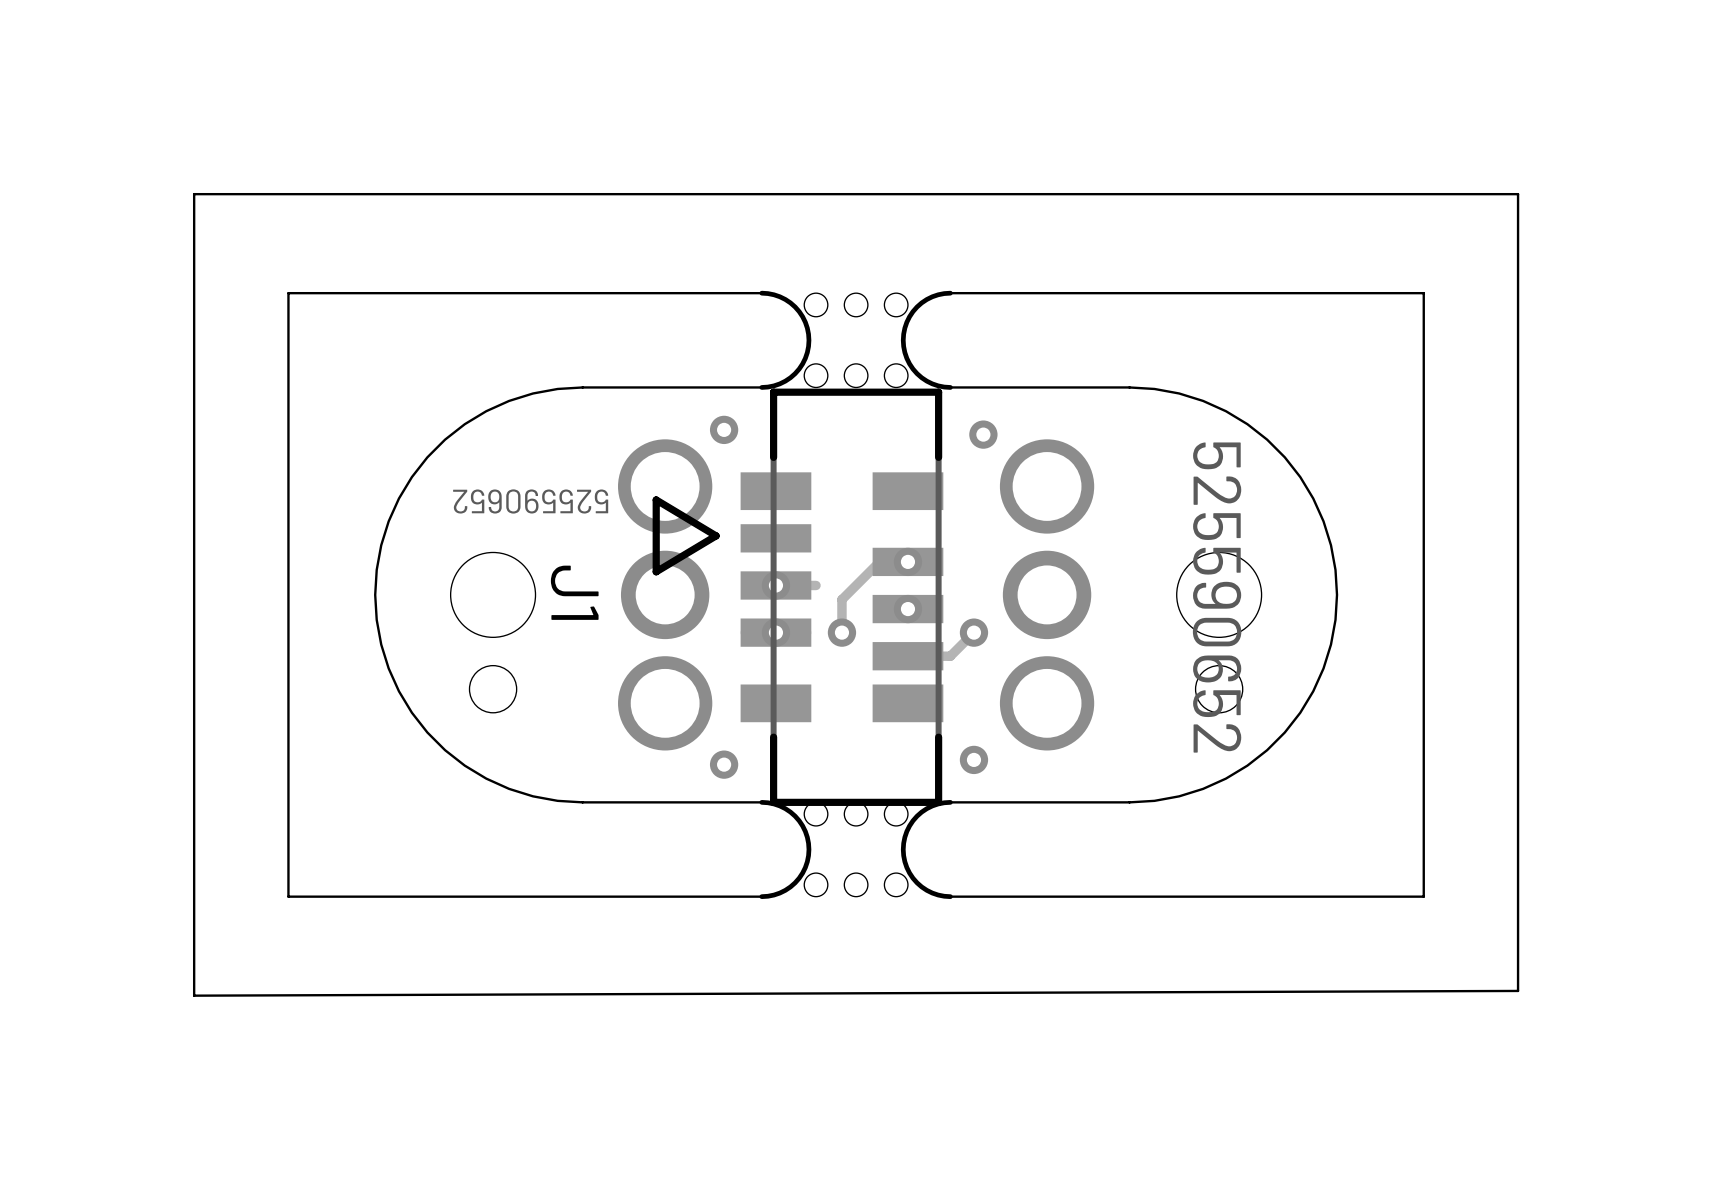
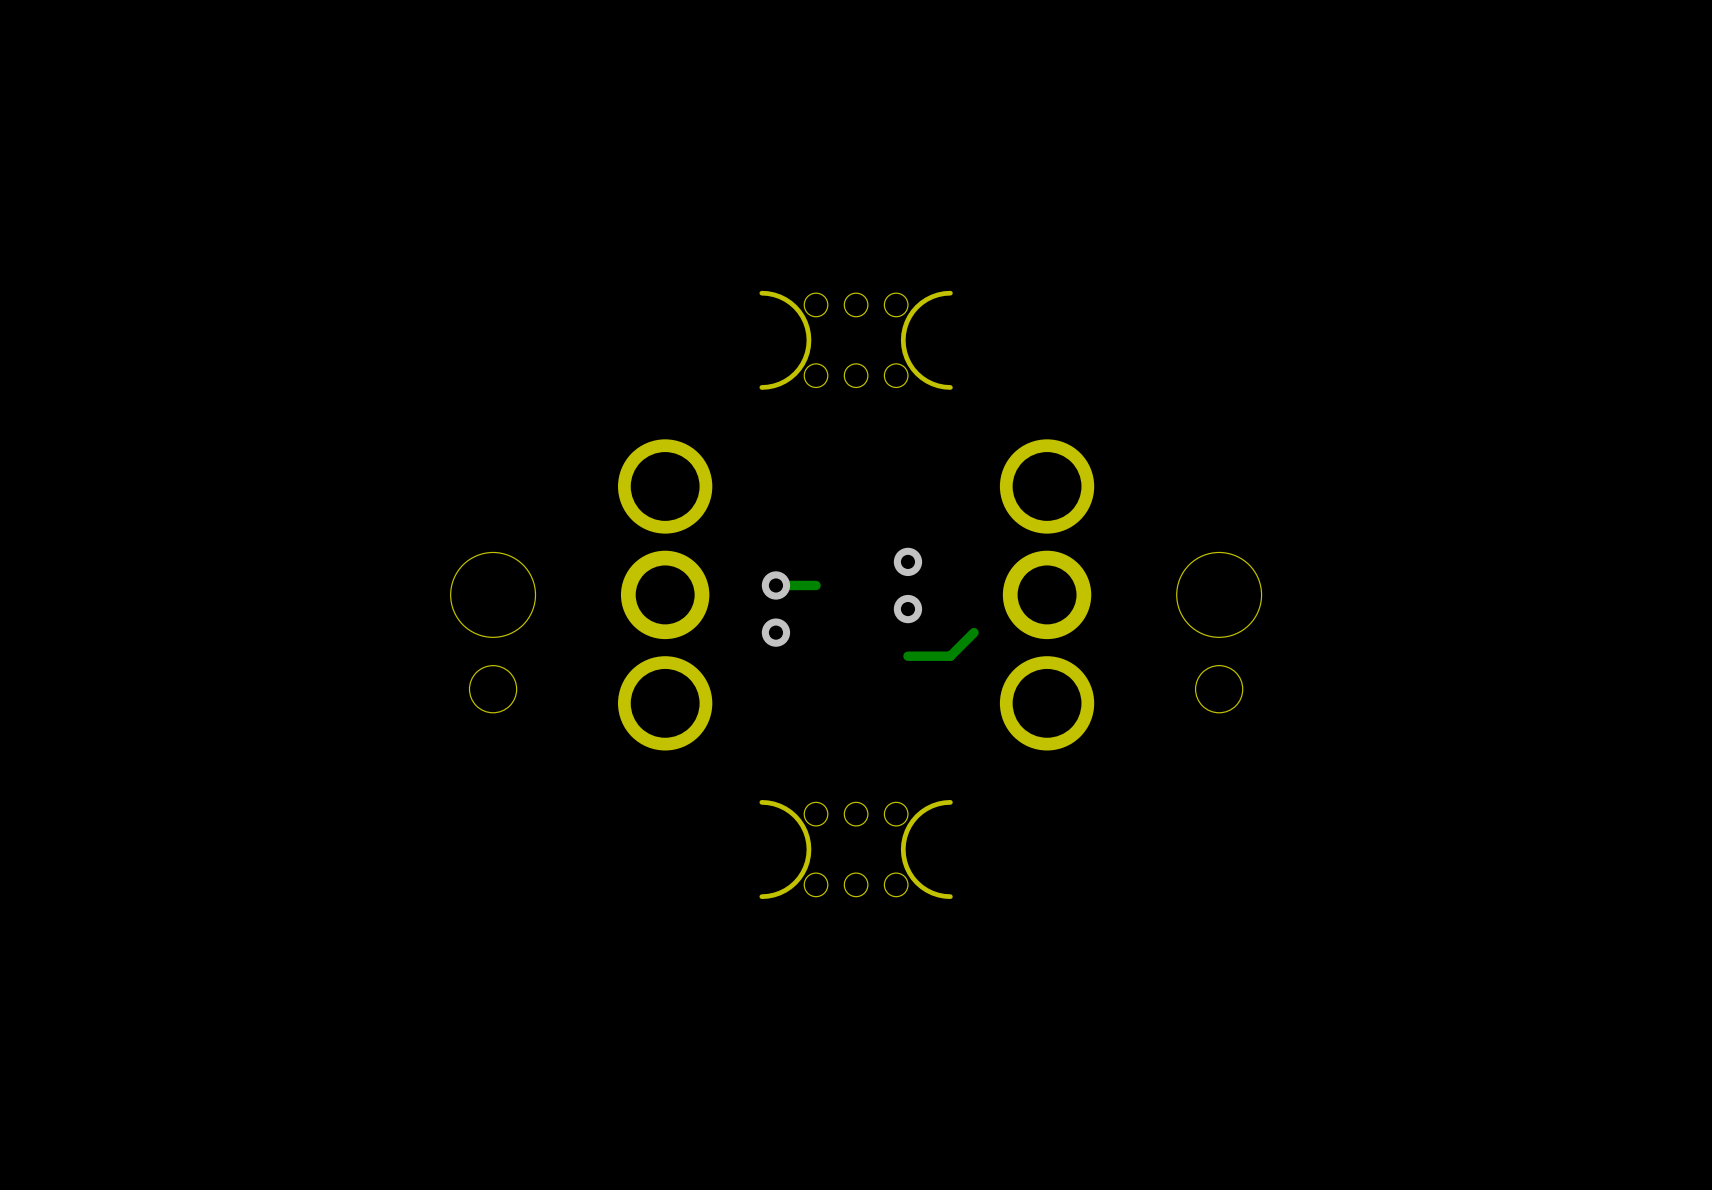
board edge: (1518, 194) (1518, 990) (194, 995) (194, 194) (1518, 194) -> none
board edge: (761, 293) (288, 293) (288, 896) (761, 896) -> none
board edge: (950, 293) (1423, 293) (1423, 896) (950, 896) -> none
board edge: (761, 387) (557, 388) (533, 393) (509, 400) (486, 411) (464, 424) (445, 439) (427, 457) (411, 477) (398, 498) (388, 521) (381, 545) (376, 569) (375, 594) (376, 619) (381, 644) (388, 668) (398, 691) (411, 712) (427, 732) (445, 750) (464, 765) (486, 778) (509, 788) (533, 796) (557, 800) (761, 802) -> none
board edge: (950, 387) (1154, 388) (1179, 393) (1203, 400) (1225, 411) (1247, 424) (1267, 439) (1284, 457) (1300, 477) (1313, 498) (1323, 521) (1330, 545) (1335, 569) (1337, 594) (1335, 619) (1330, 644) (1323, 668) (1313, 691) (1300, 712) (1284, 732) (1267, 750) (1247, 765) (1225, 778) (1203, 788) (1179, 796) (1154, 800) (950, 802) -> none
via: (724, 429) -> none
via: (983, 434) -> none
track: (907, 561) (879, 561) (841, 599) (841, 632) -> none
J1: 525590652 (797, 597) -> none
via: (841, 632) -> none
via: (973, 632) -> none
via: (973, 759) -> none
via: (724, 764) -> none

